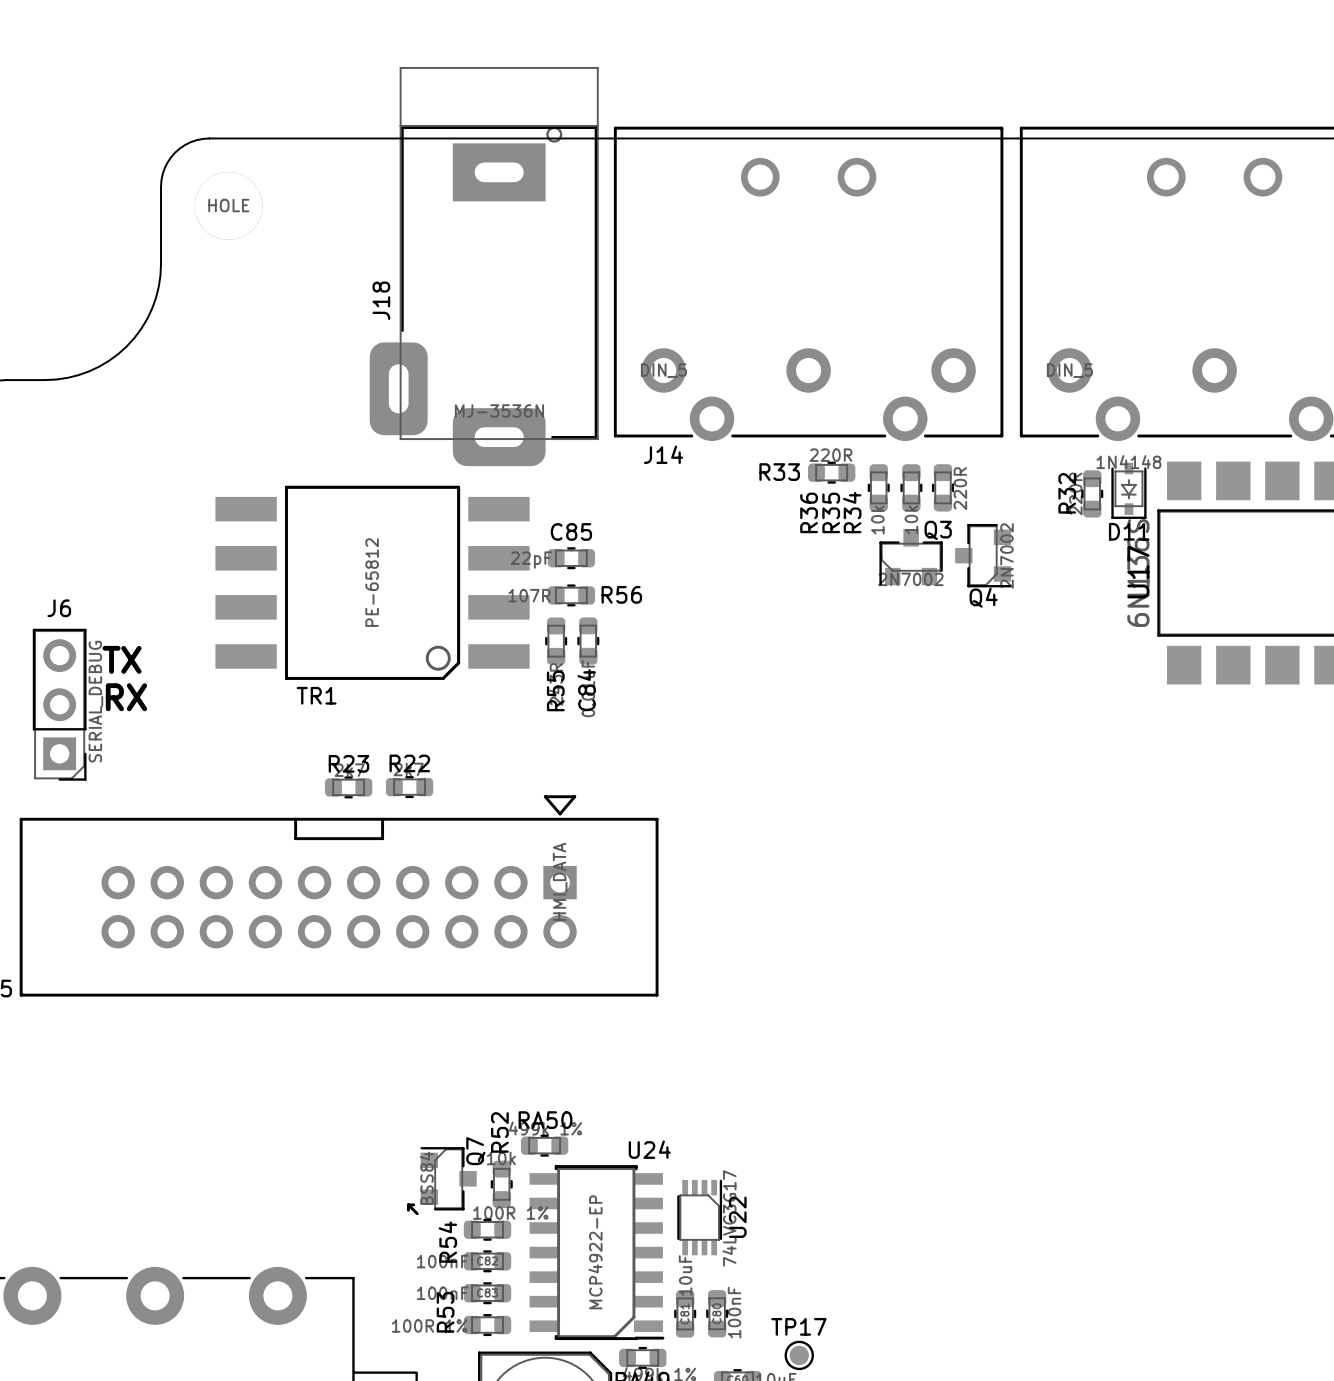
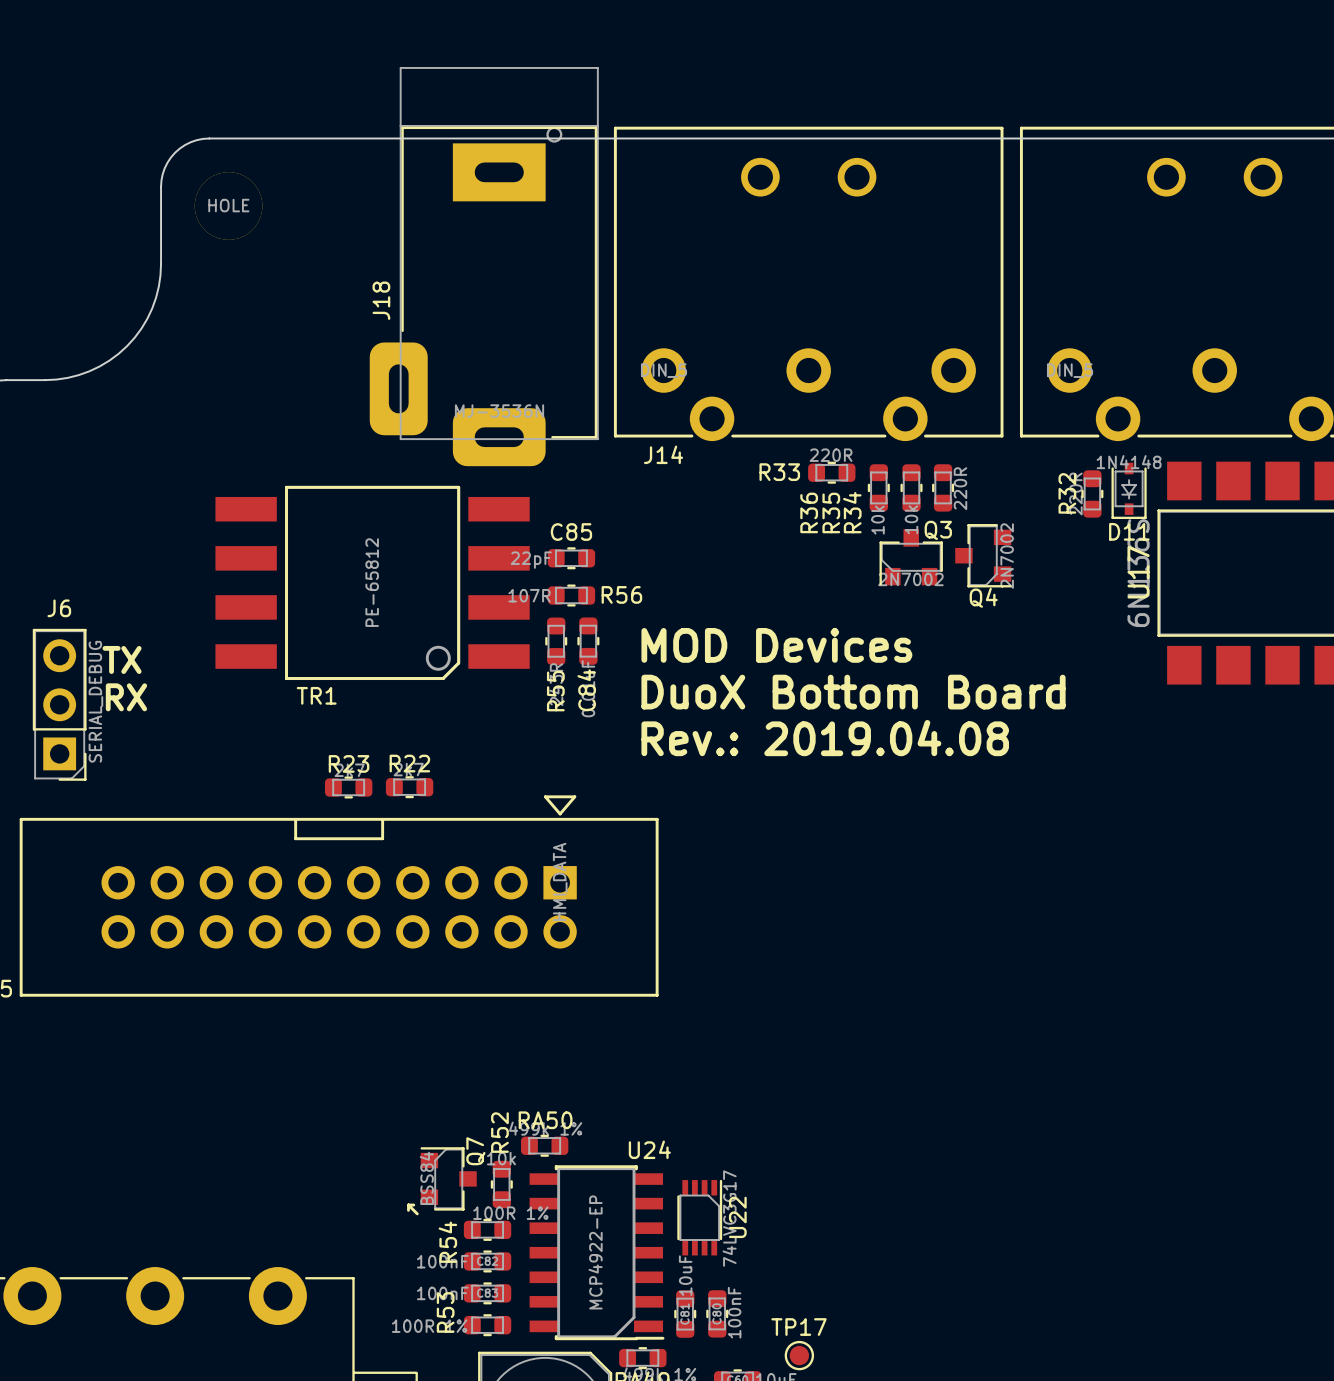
text: none -> MOD Devices (776, 645)
text: none -> DuoX Bottom Board (853, 692)
text: none -> Rev.: 2019.04.08 (825, 738)

